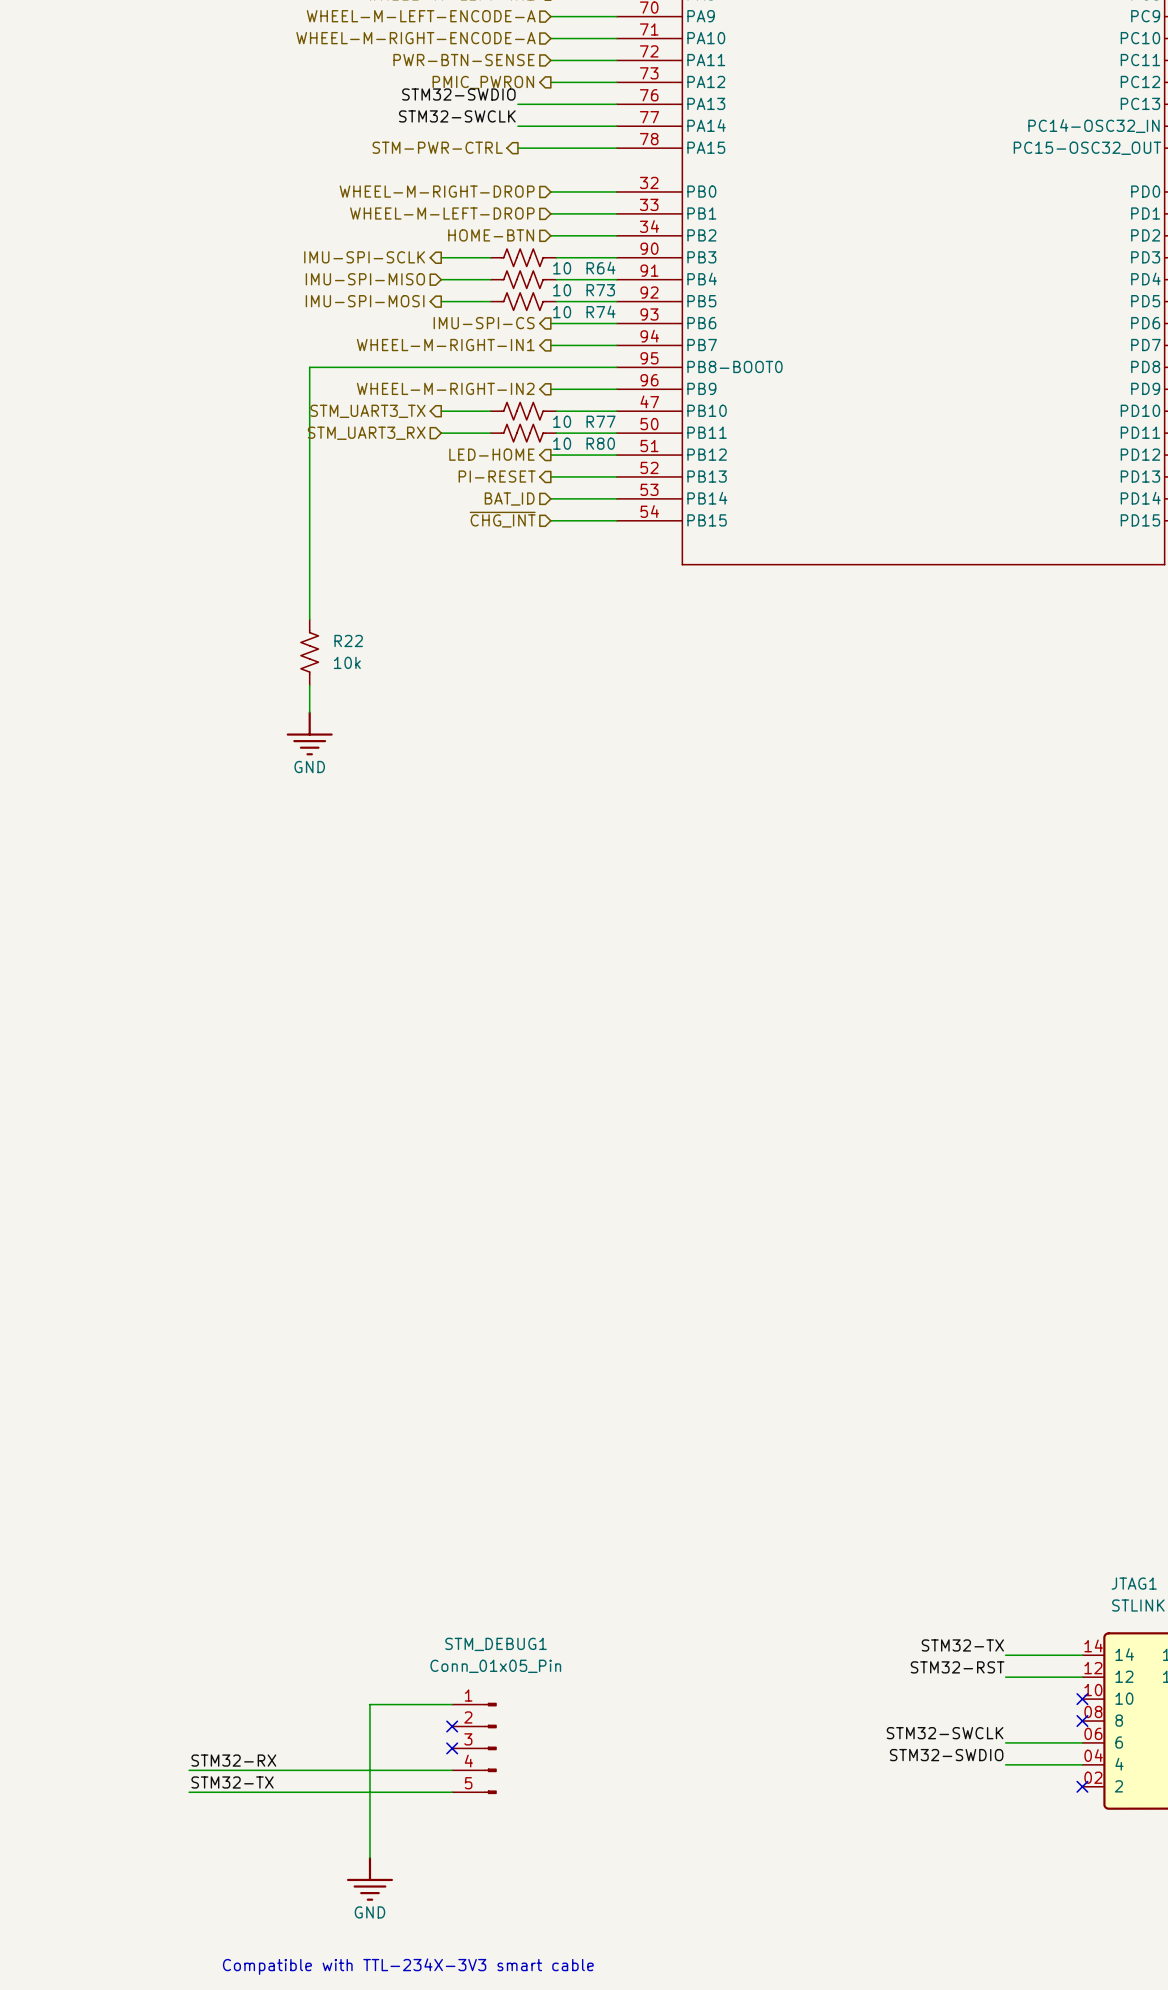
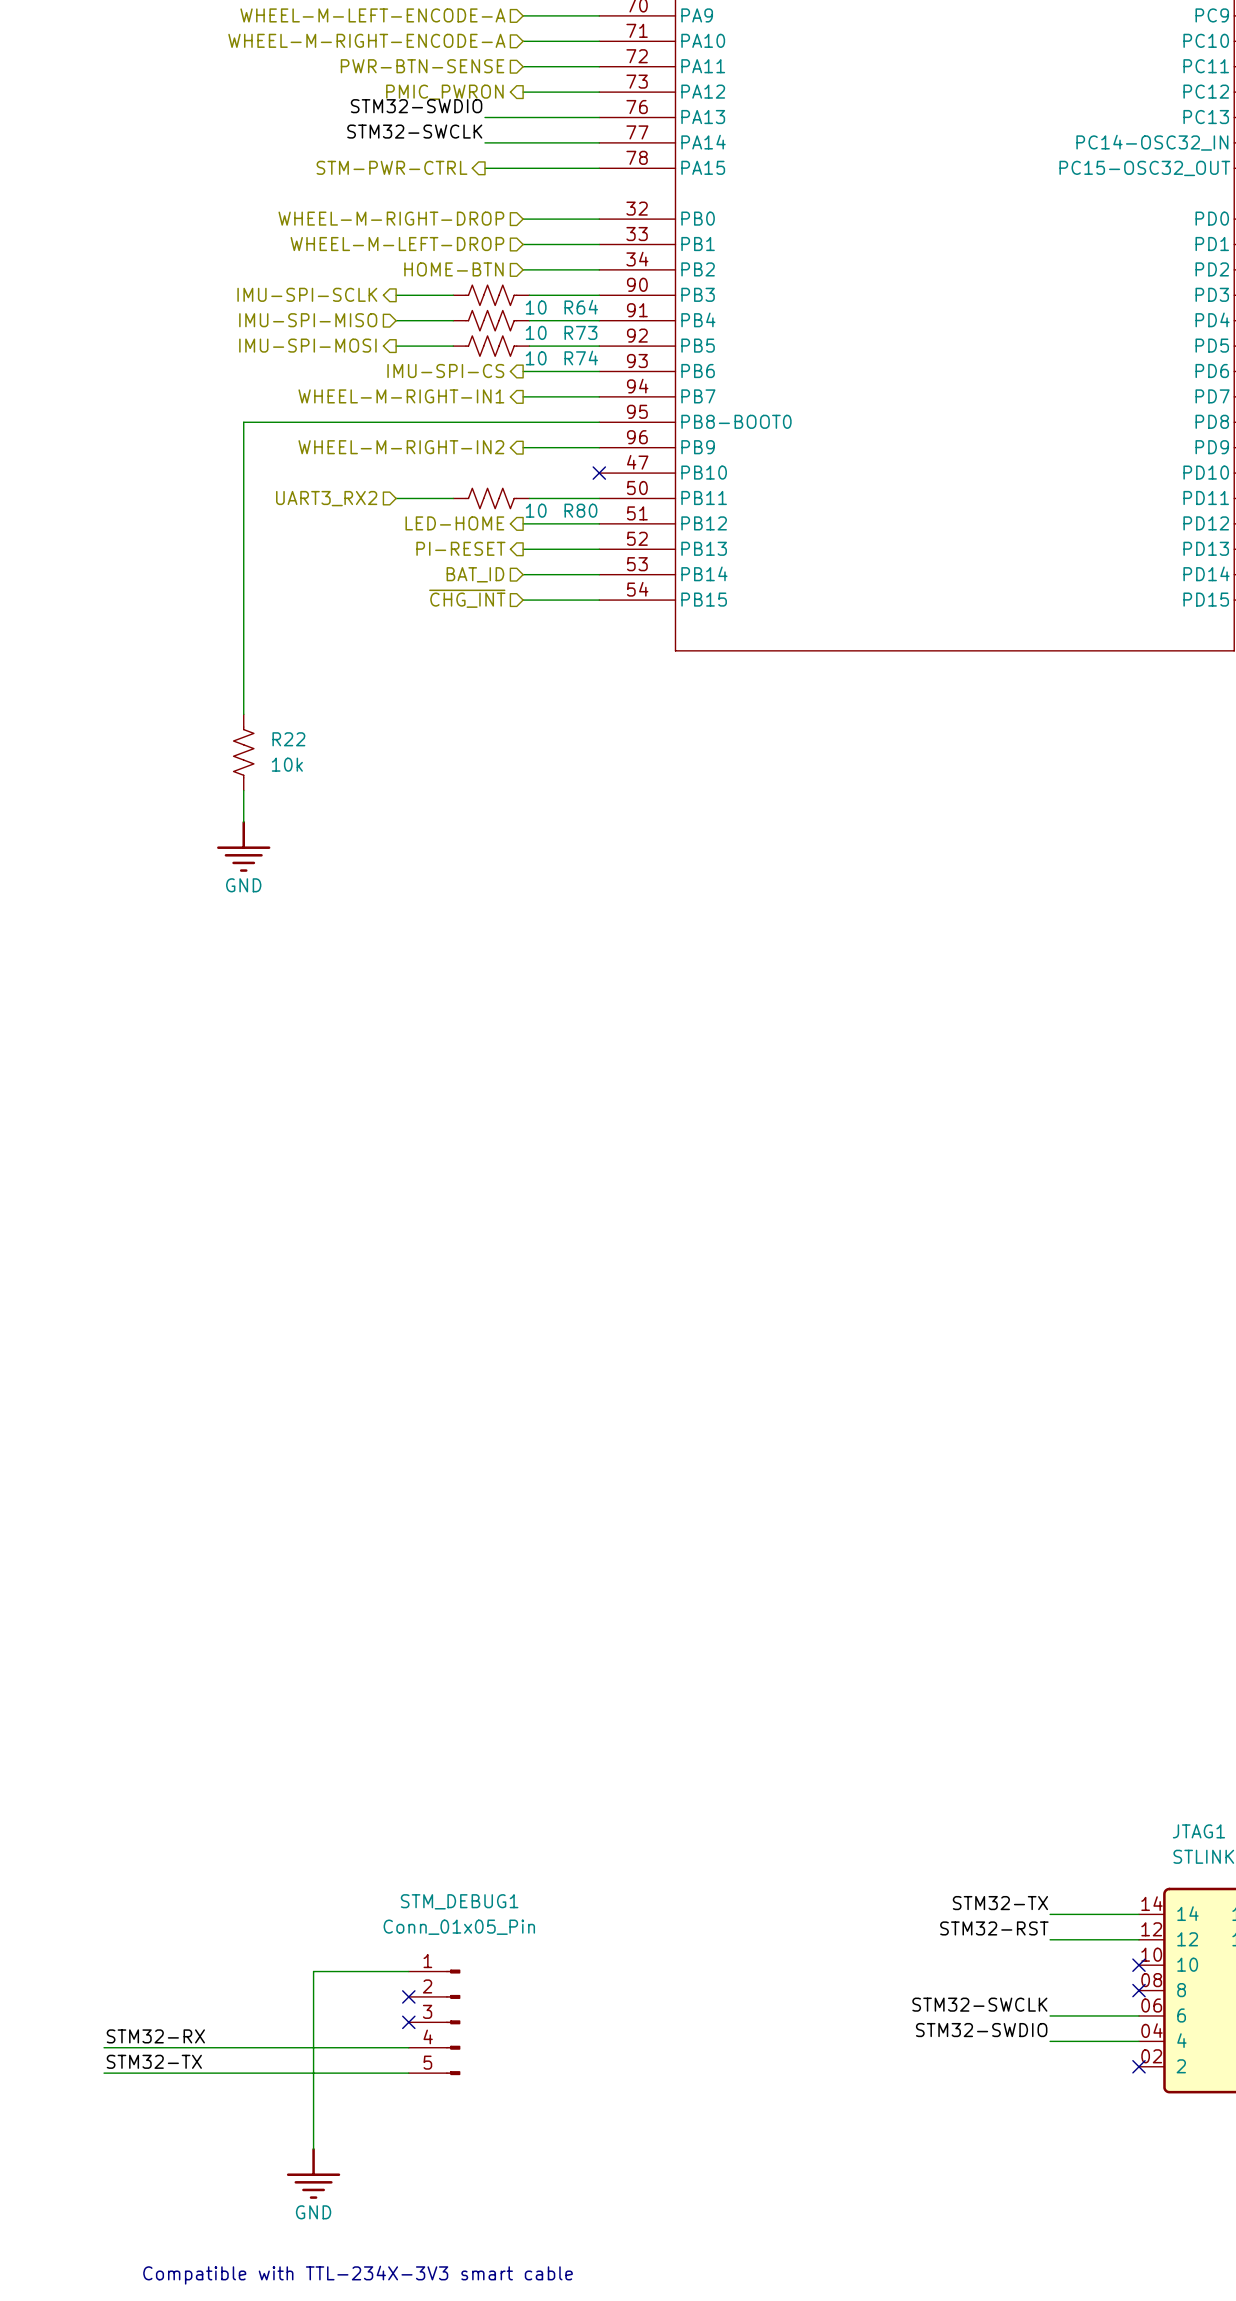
hierarchical label: STM_UART3_TX (367, 411) -> none
wire: (441, 411) (490, 411) -> none
R77: 10 (523, 411) -> none
wire: (556, 411) (616, 411) -> none
no-connect mark: none -> (599, 473)
hierarchical label: STM_UART3_RX (366, 433) -> UART3_RX2 (326, 498)

